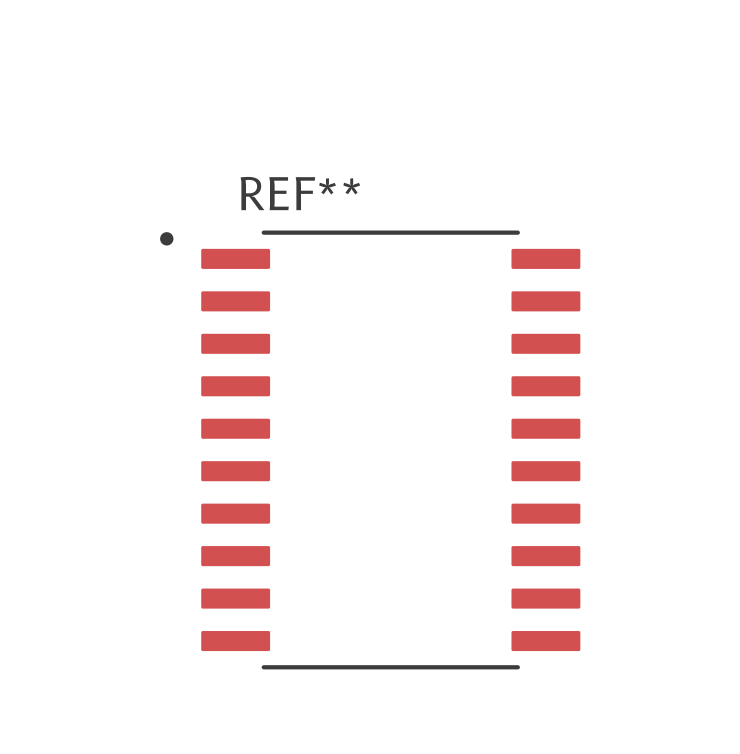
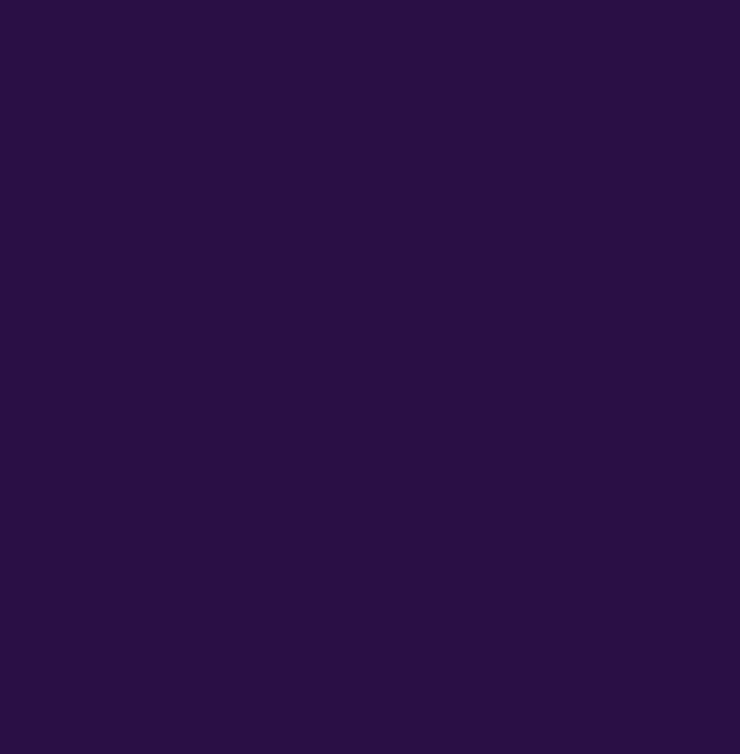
REF**: (370, 449) -> none

